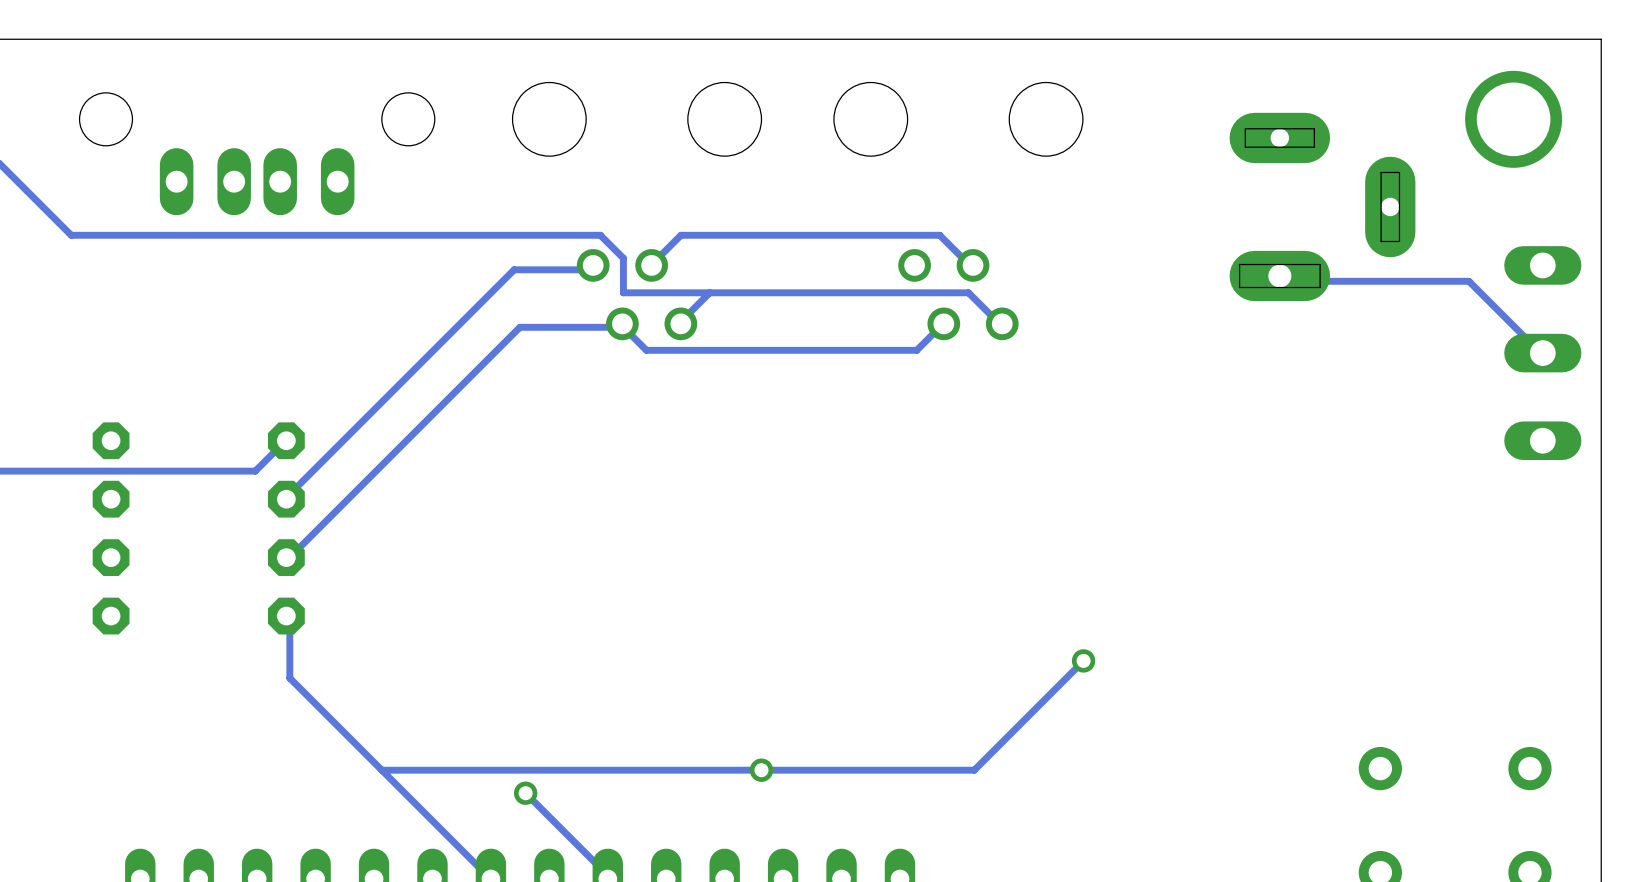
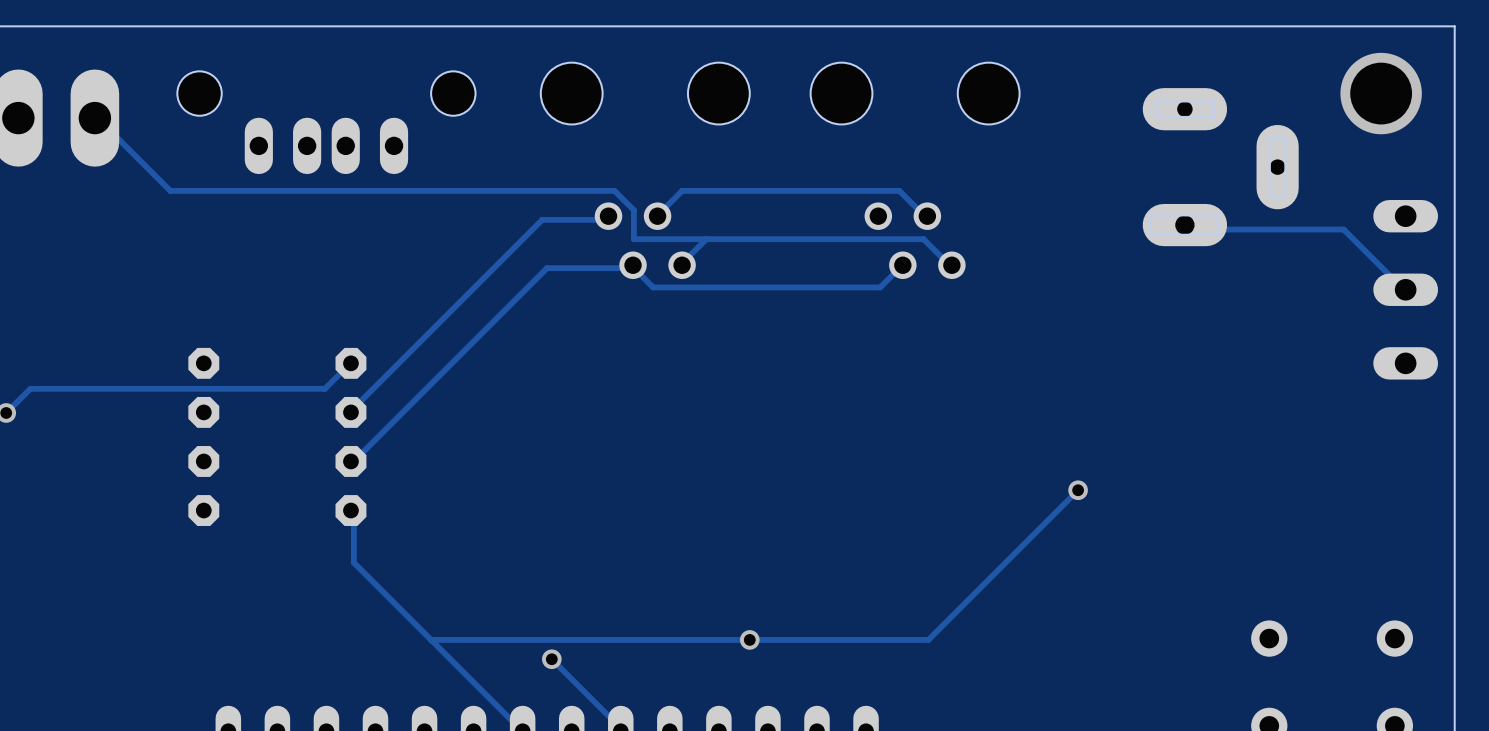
track: none -> (1078, 490) (1020, 548)
via position: (1083, 660) -> (1078, 490)

